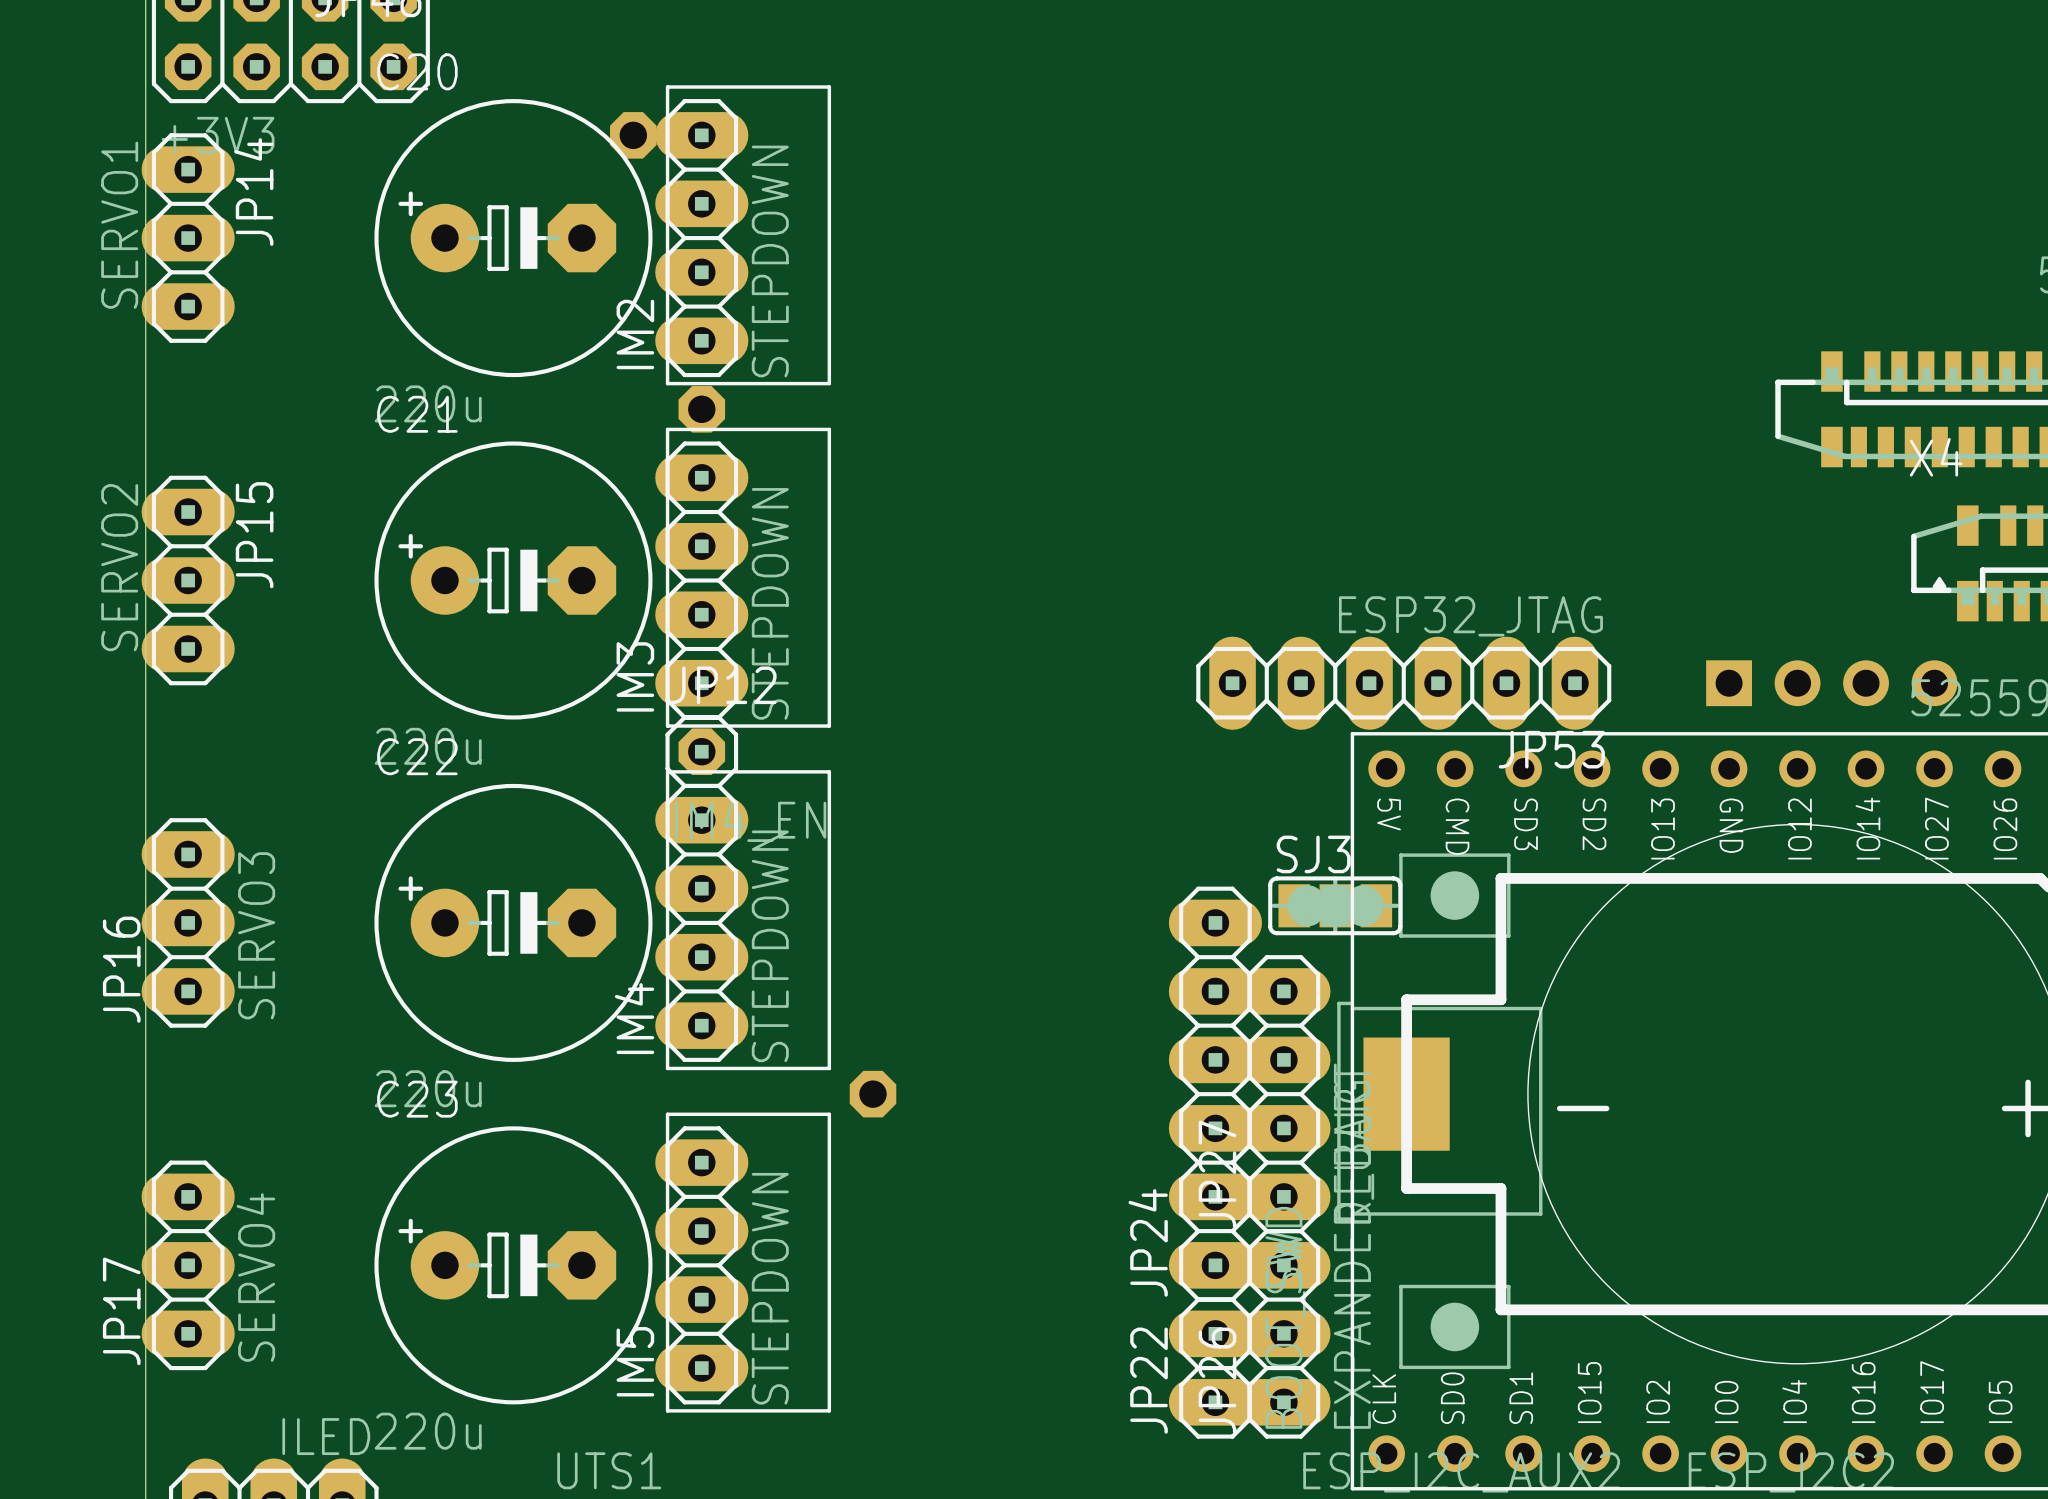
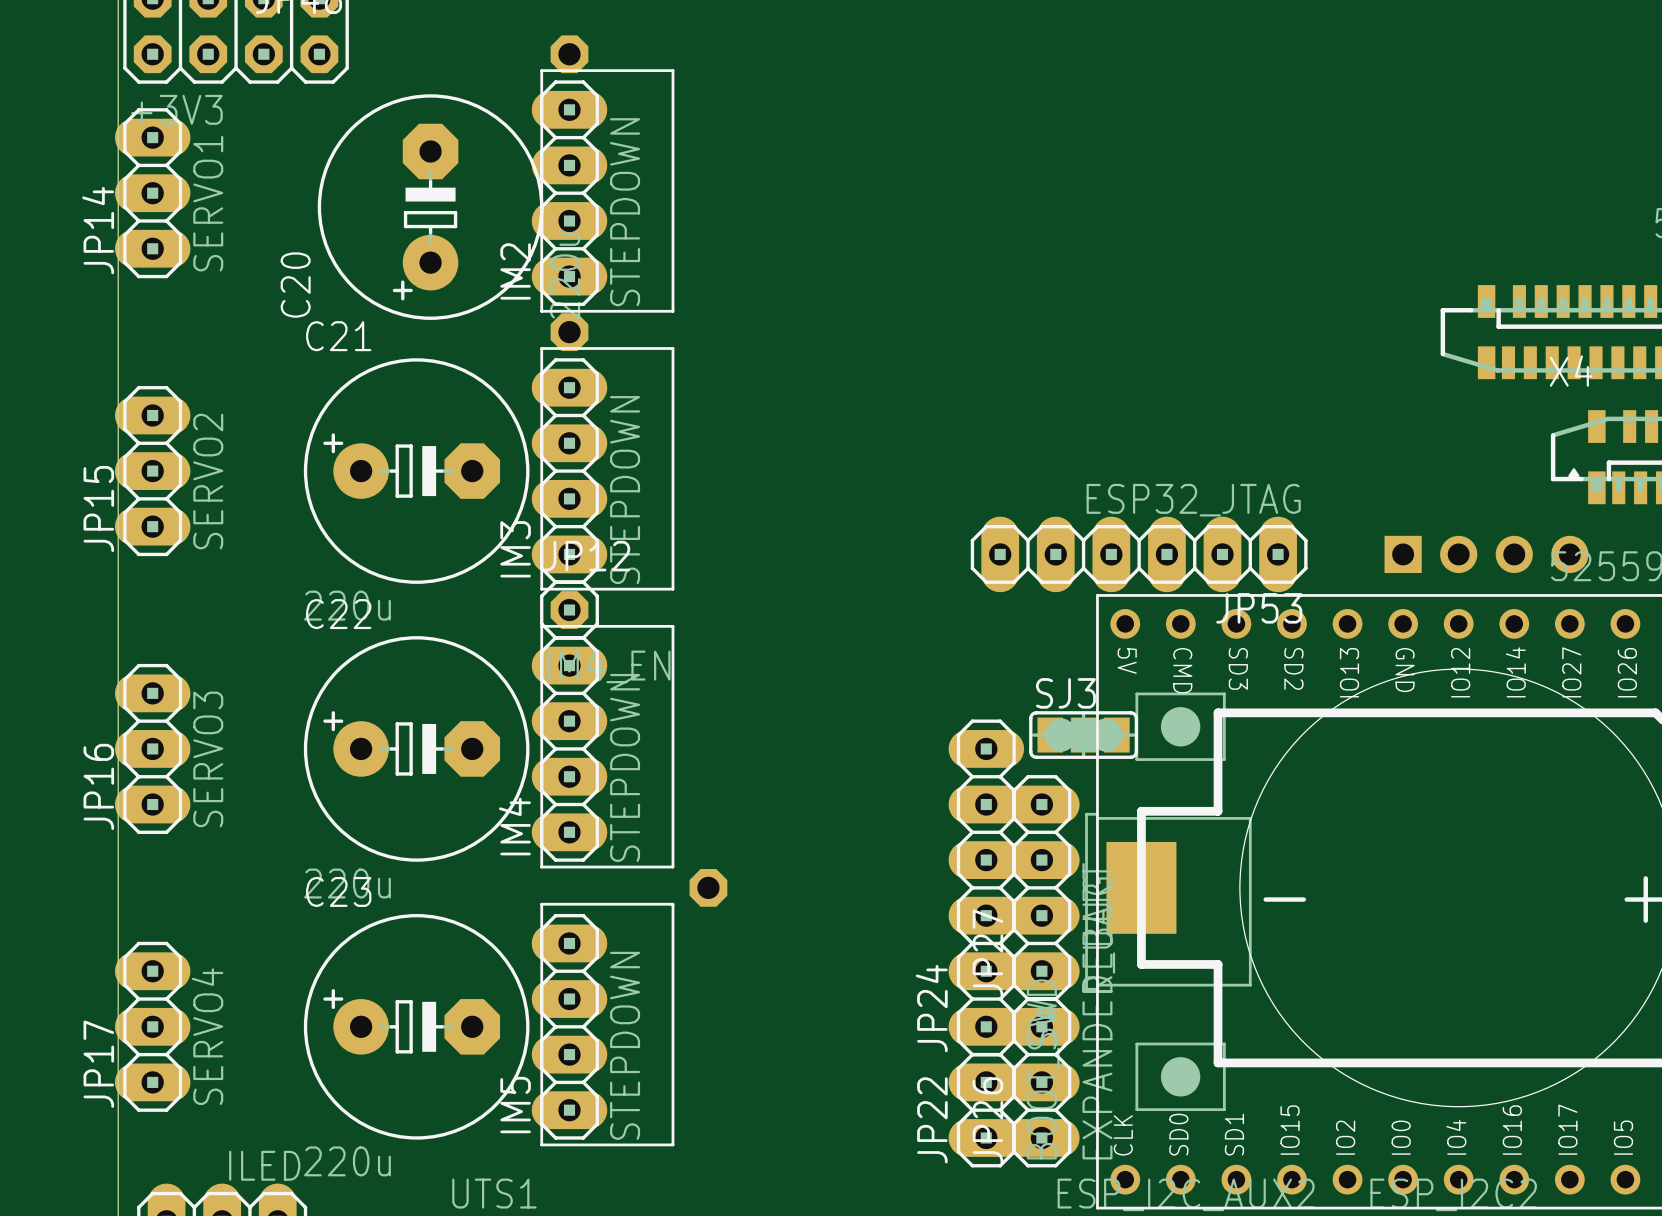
part position: (633, 135) -> (569, 54)
JP14 name position: JP14 (253, 192) -> JP14 (98, 230)
JP14 value position: SERVO1 (119, 225) -> SERVO1 (208, 203)
C20 rotation: 0° (513, 238) -> 90° counterclockwise (430, 207)
JP15 name position: JP15 (254, 535) -> JP15 (98, 509)
JP15 value position: SERVO2 (119, 567) -> SERVO2 (208, 481)

